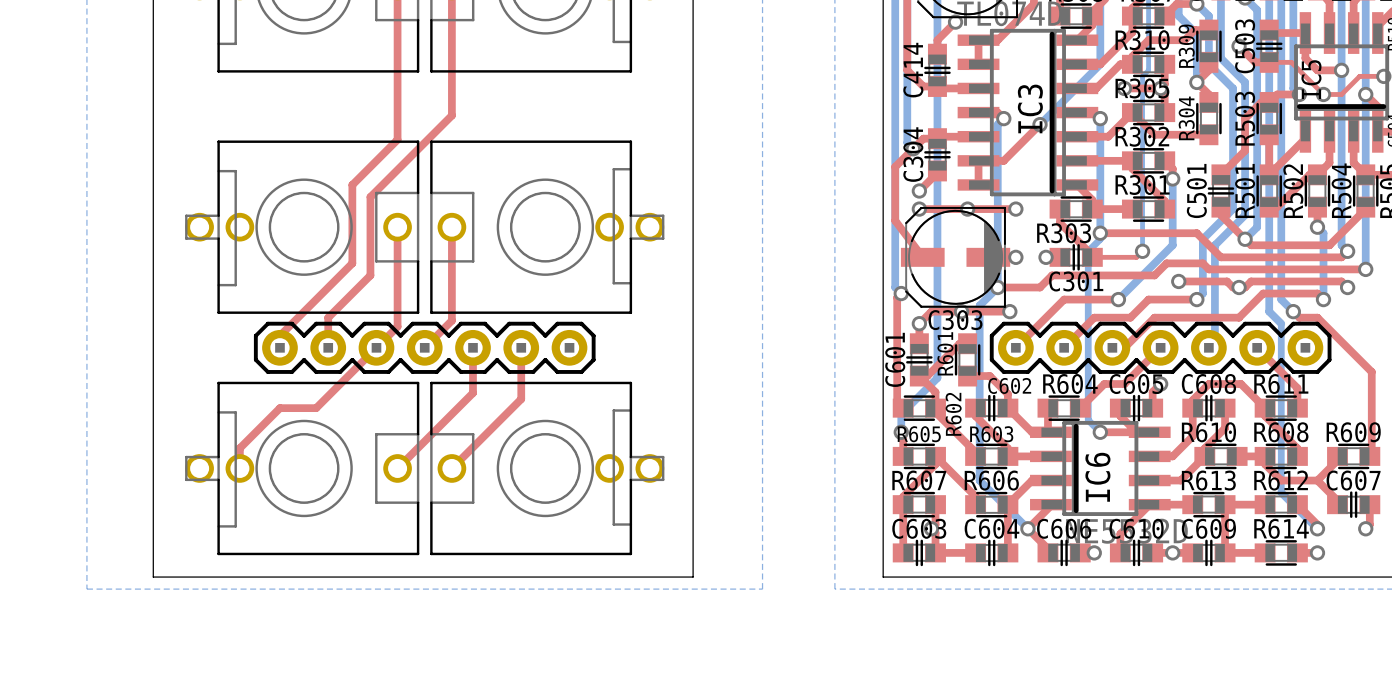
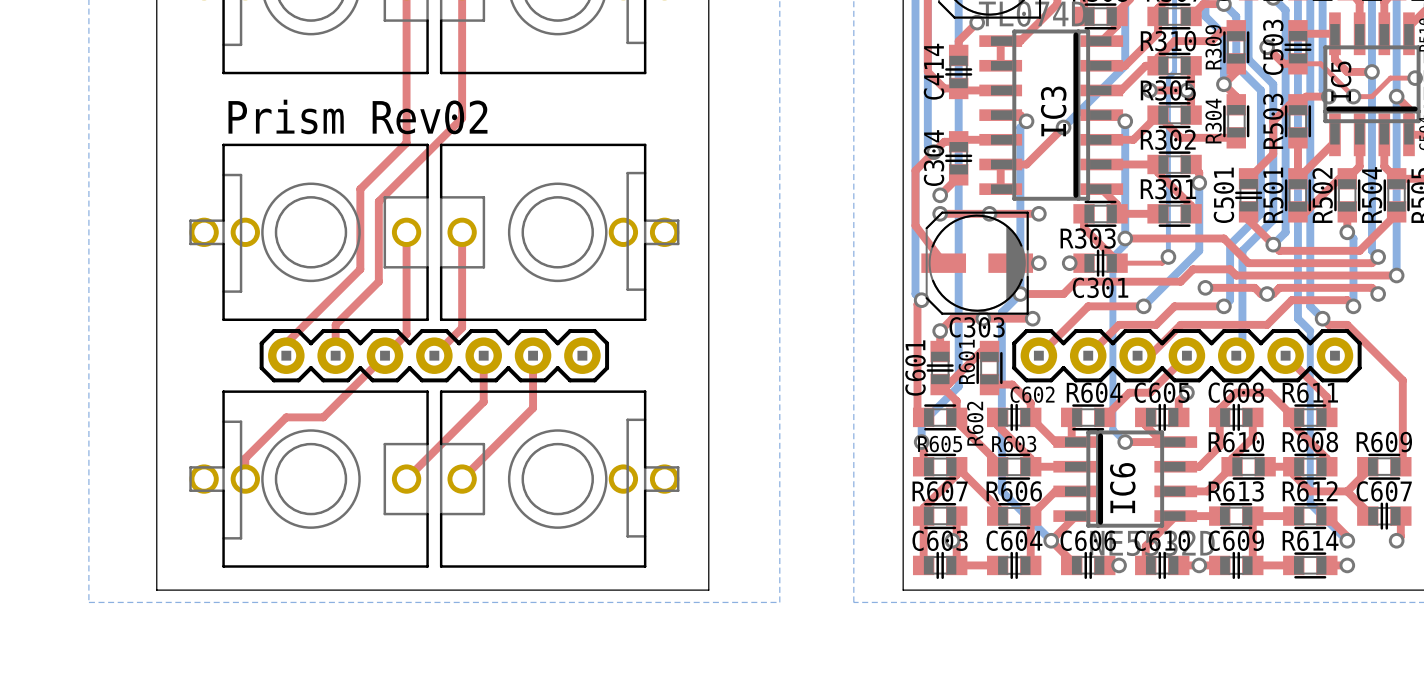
text: none -> Prism Rev02 (357, 116)

